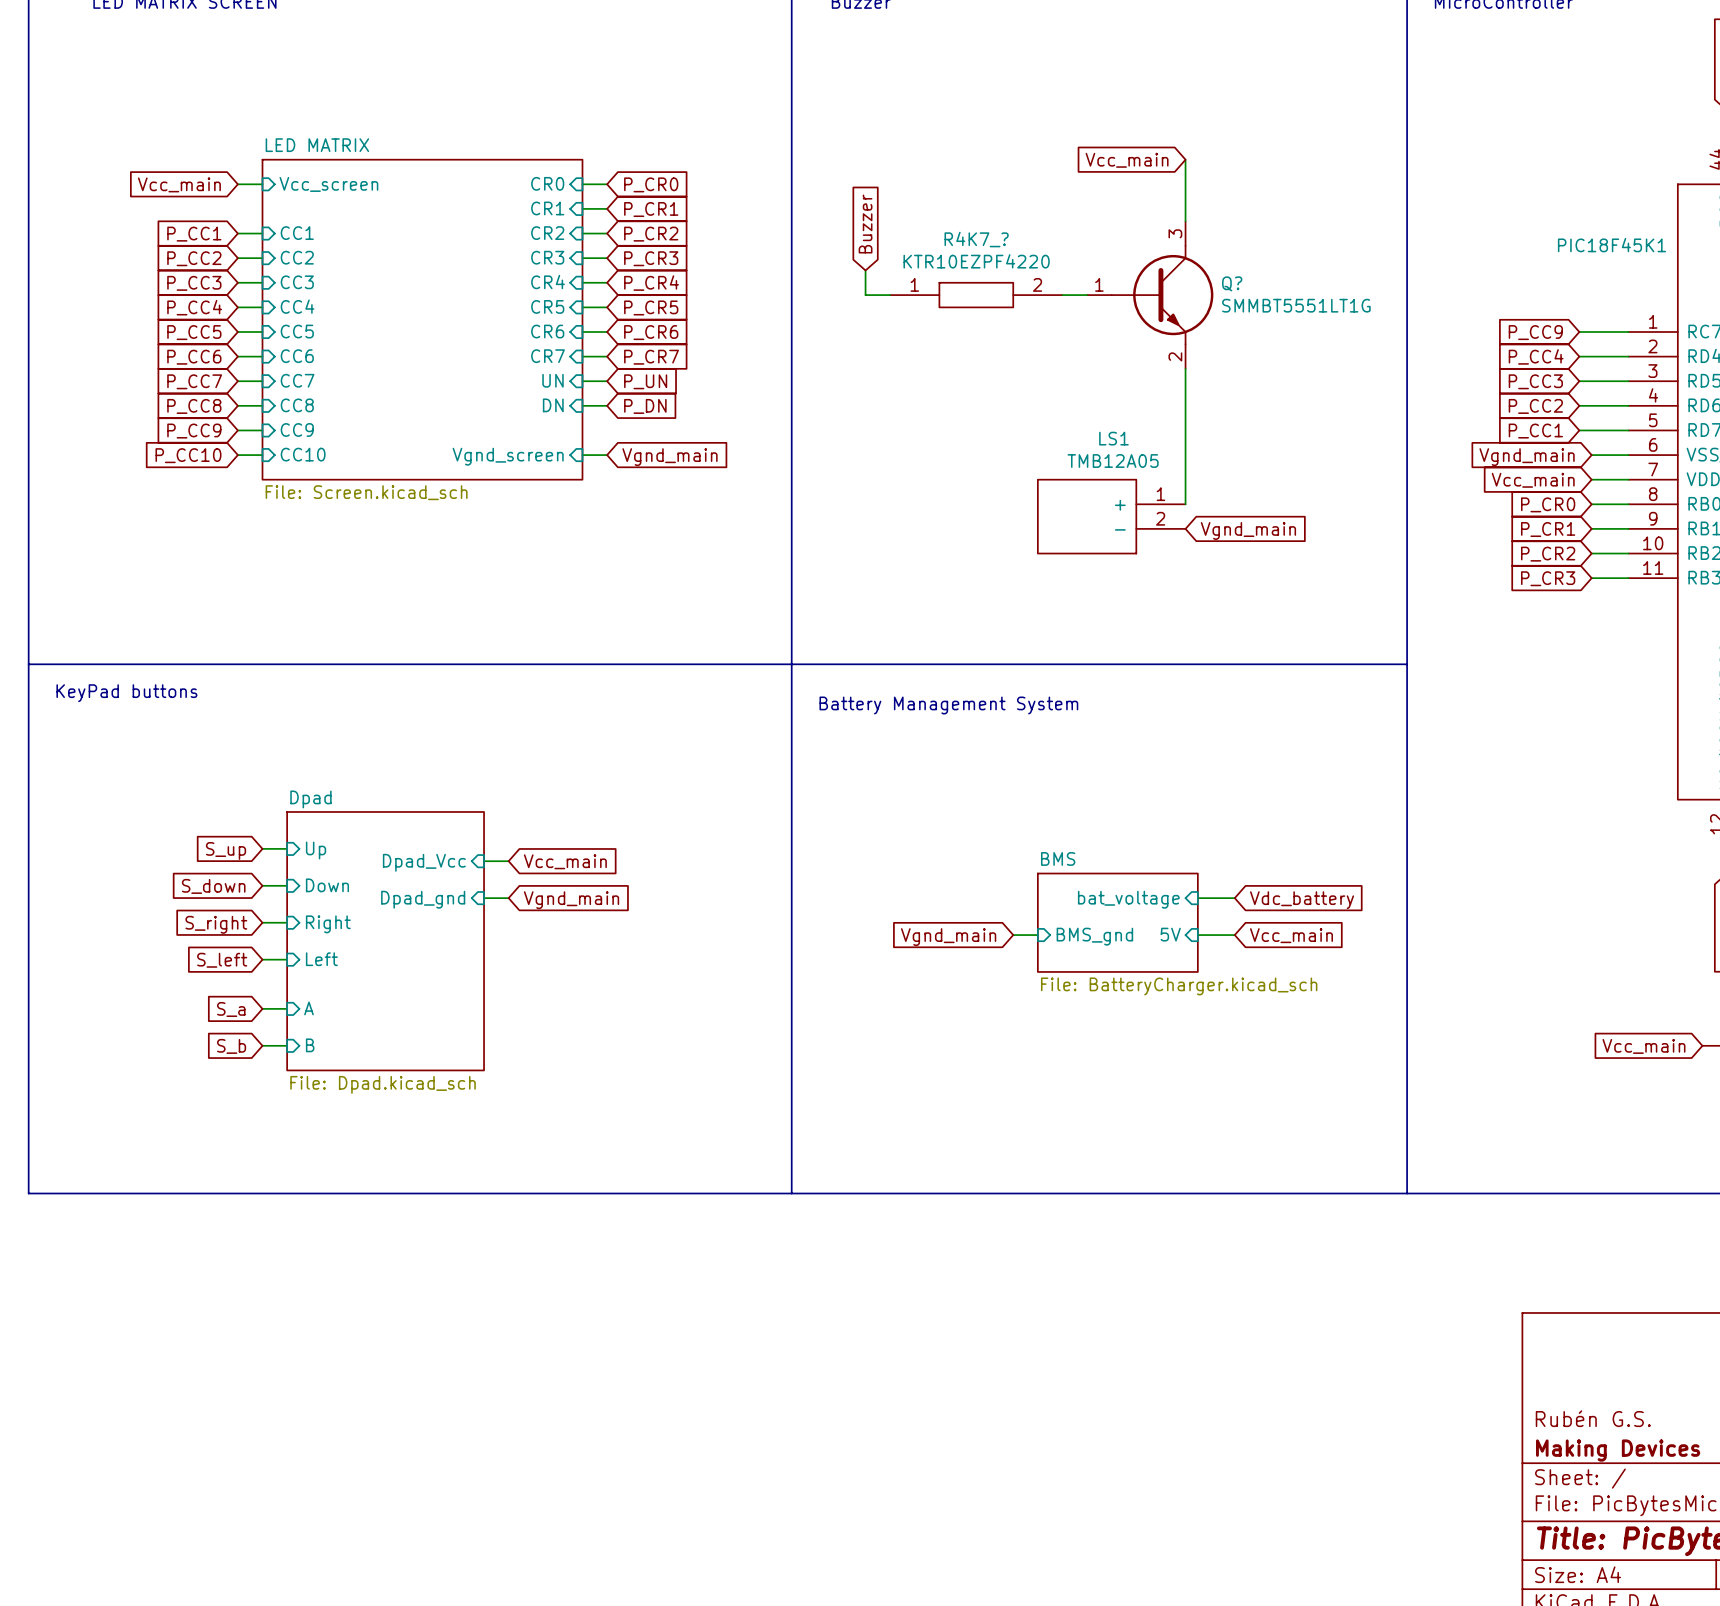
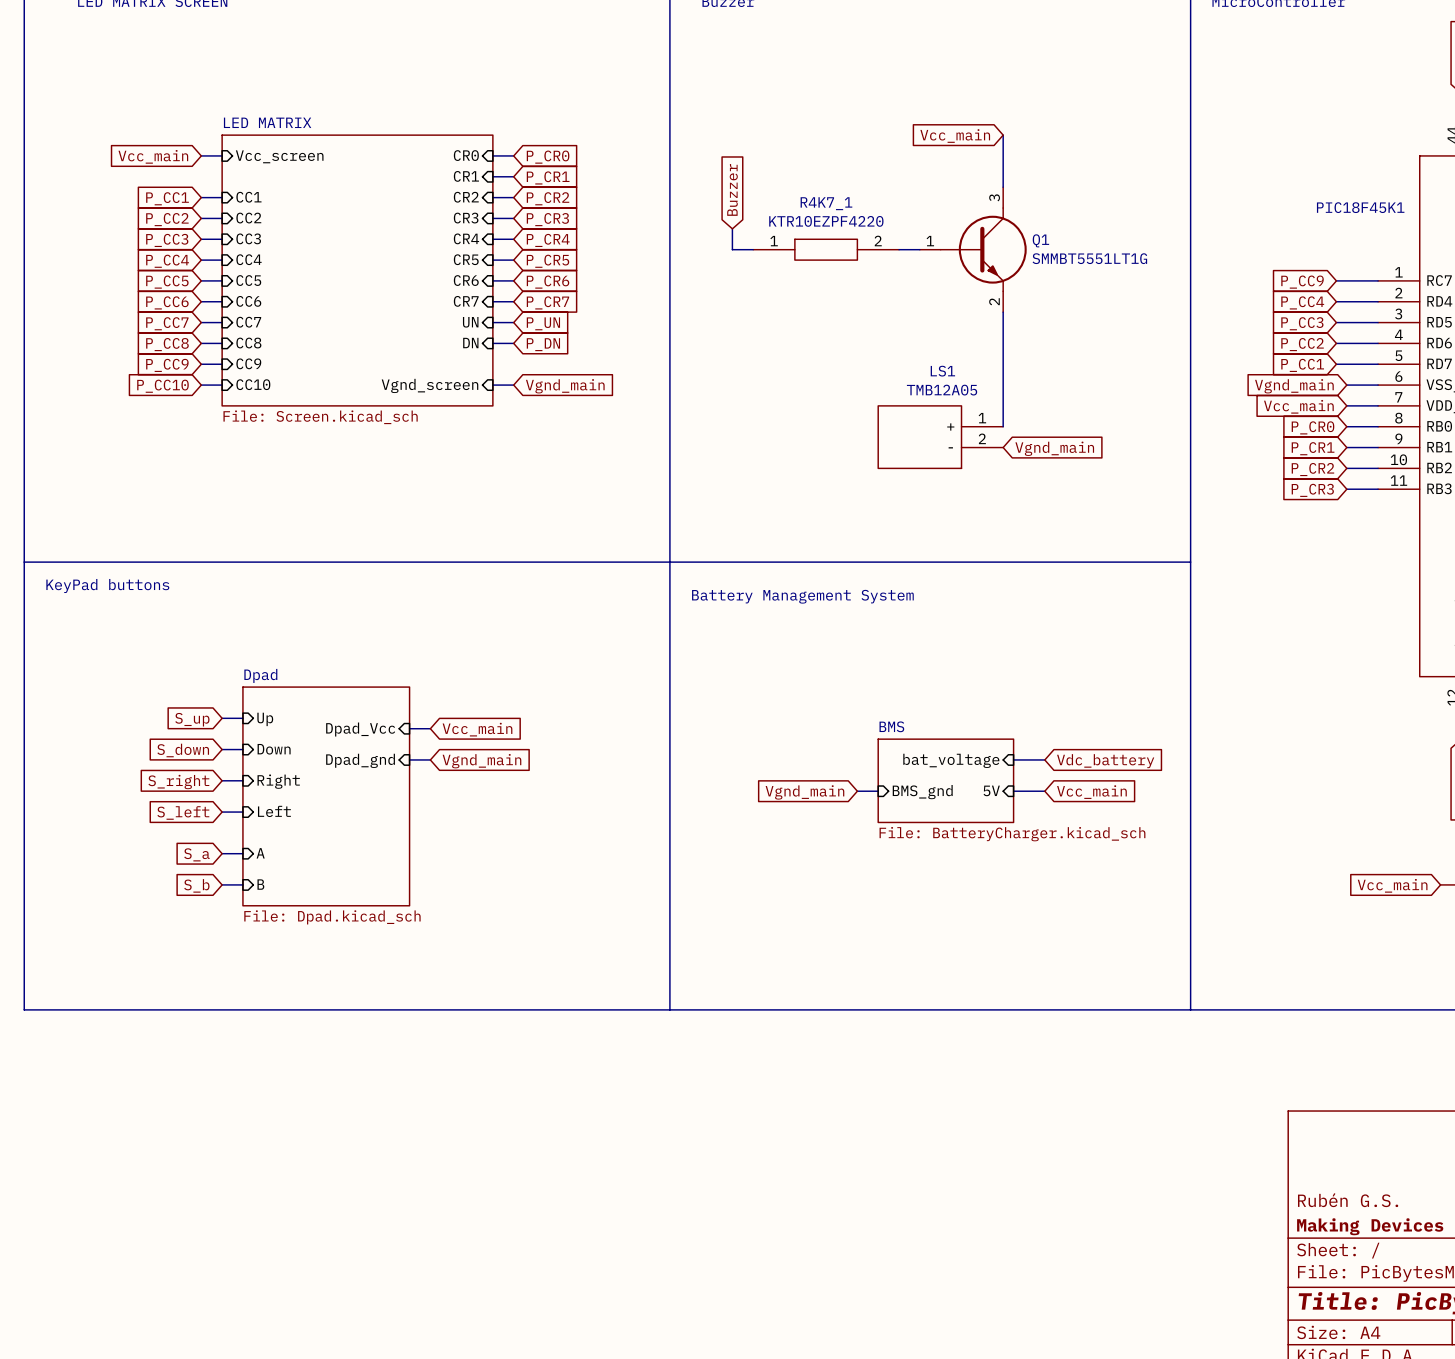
R4K7_? name: R4K7_? (976, 239) -> R4K7_1 (826, 203)
Q? name: Q? (1232, 283) -> Q1 (1040, 240)

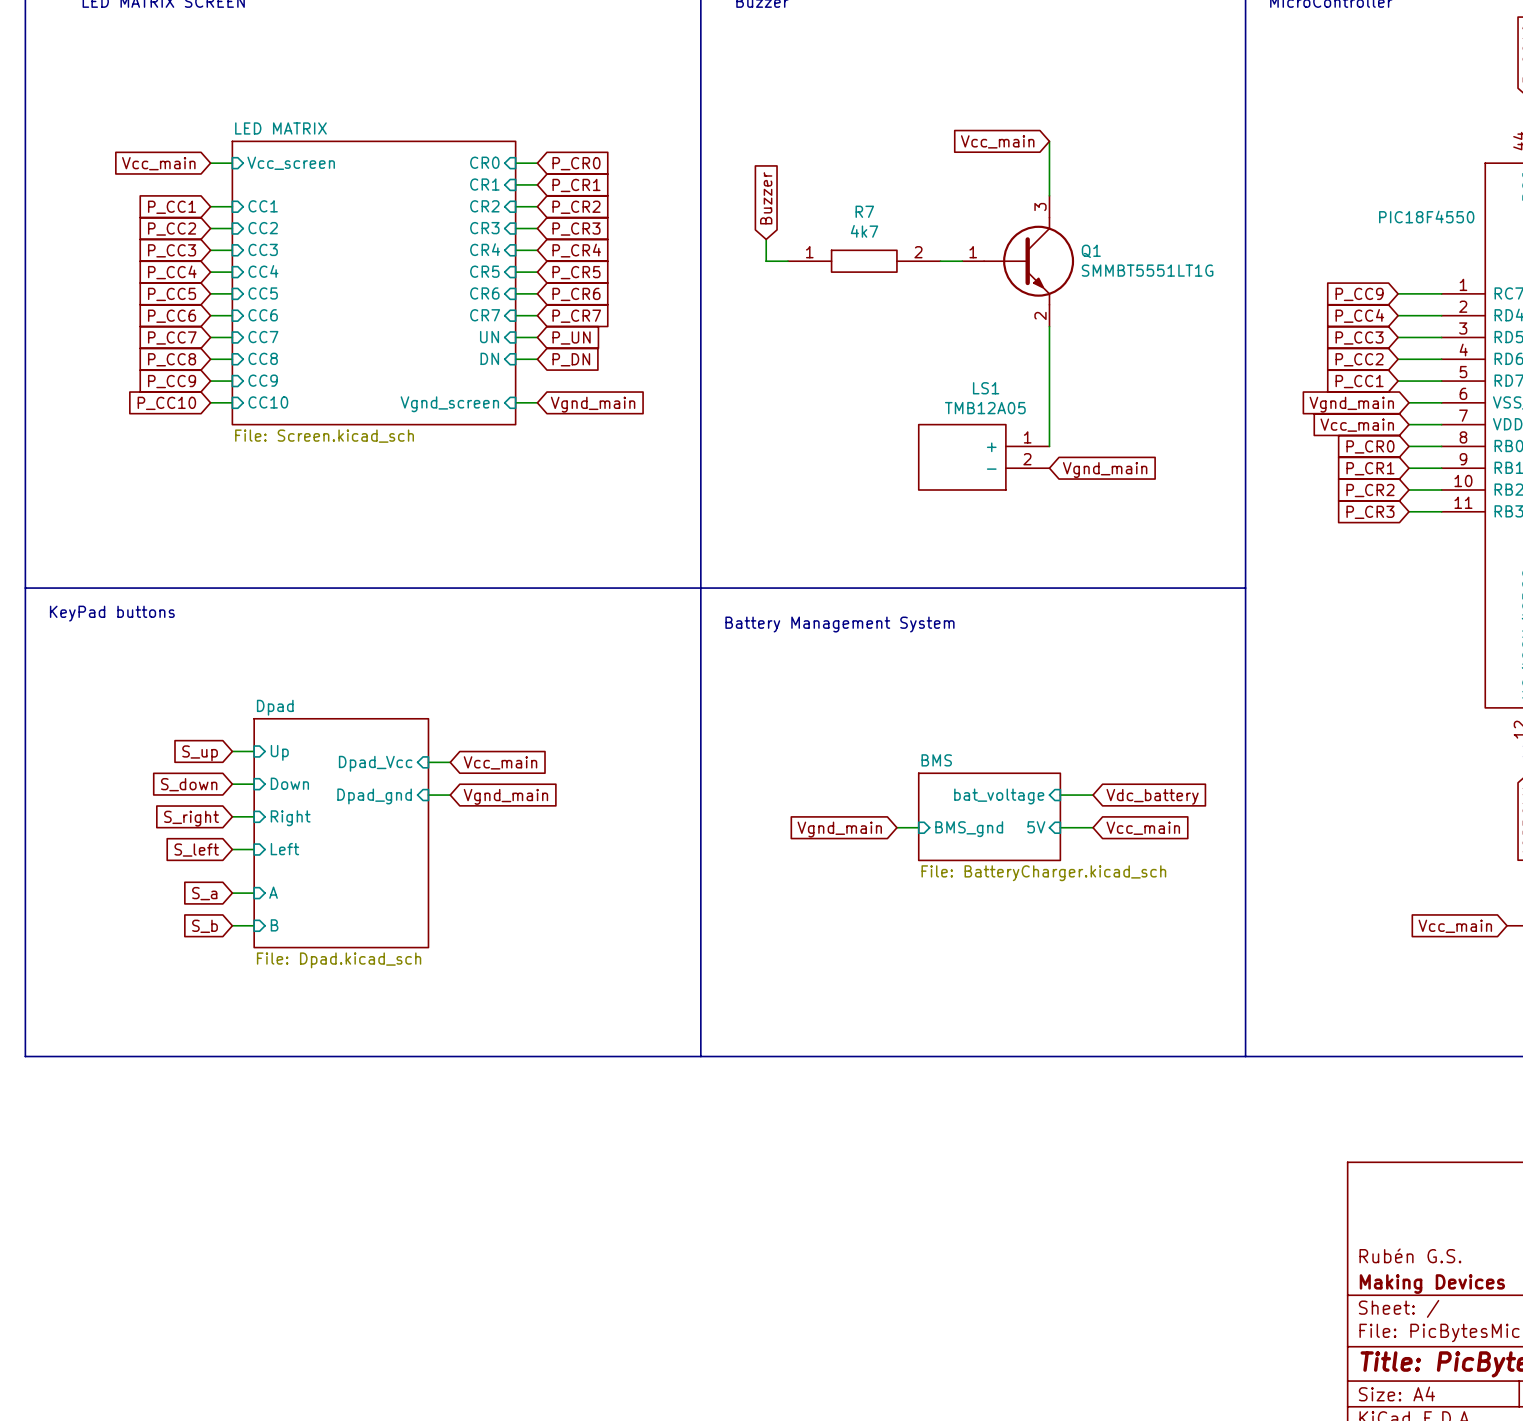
R4K7_1 name: R4K7_1 (826, 203) -> R7 (864, 211)
PIC18F45K1 name: PIC18F45K1 (1360, 207) -> PIC18F4550 (1426, 216)
R4K7_1 value: KTR10EZPF4220 (826, 221) -> 4k7 (864, 231)

